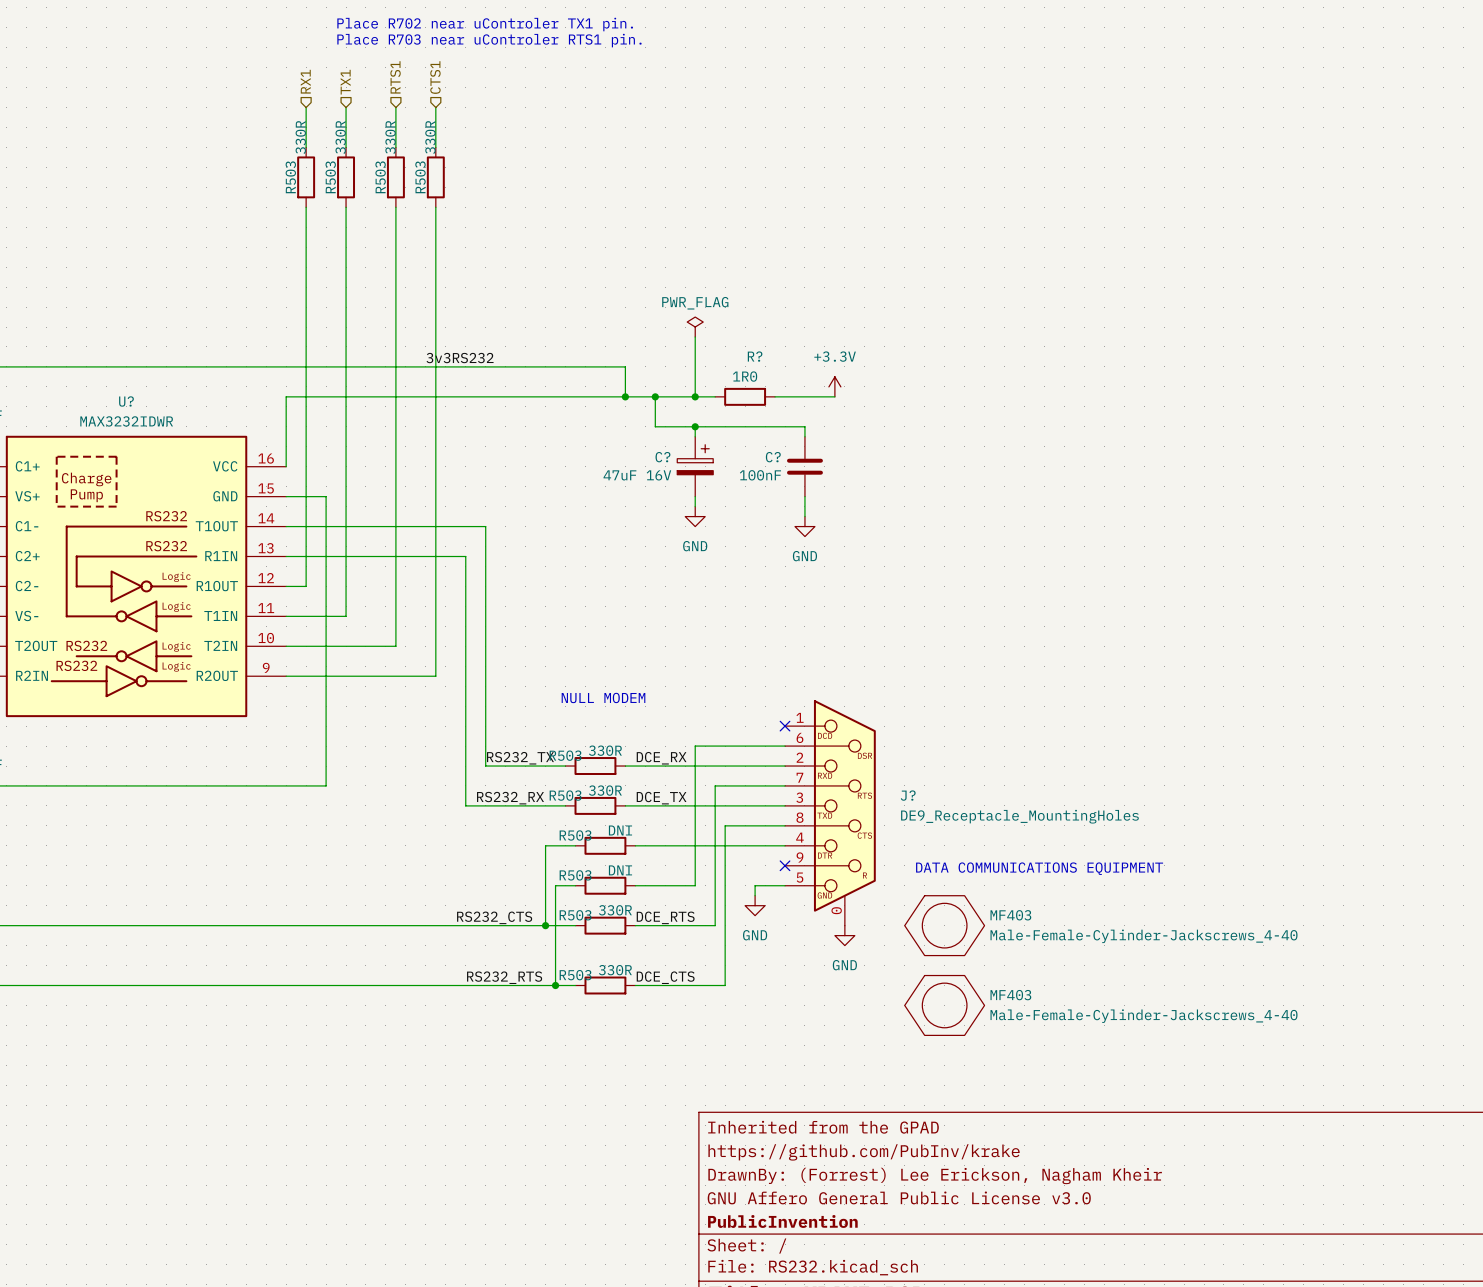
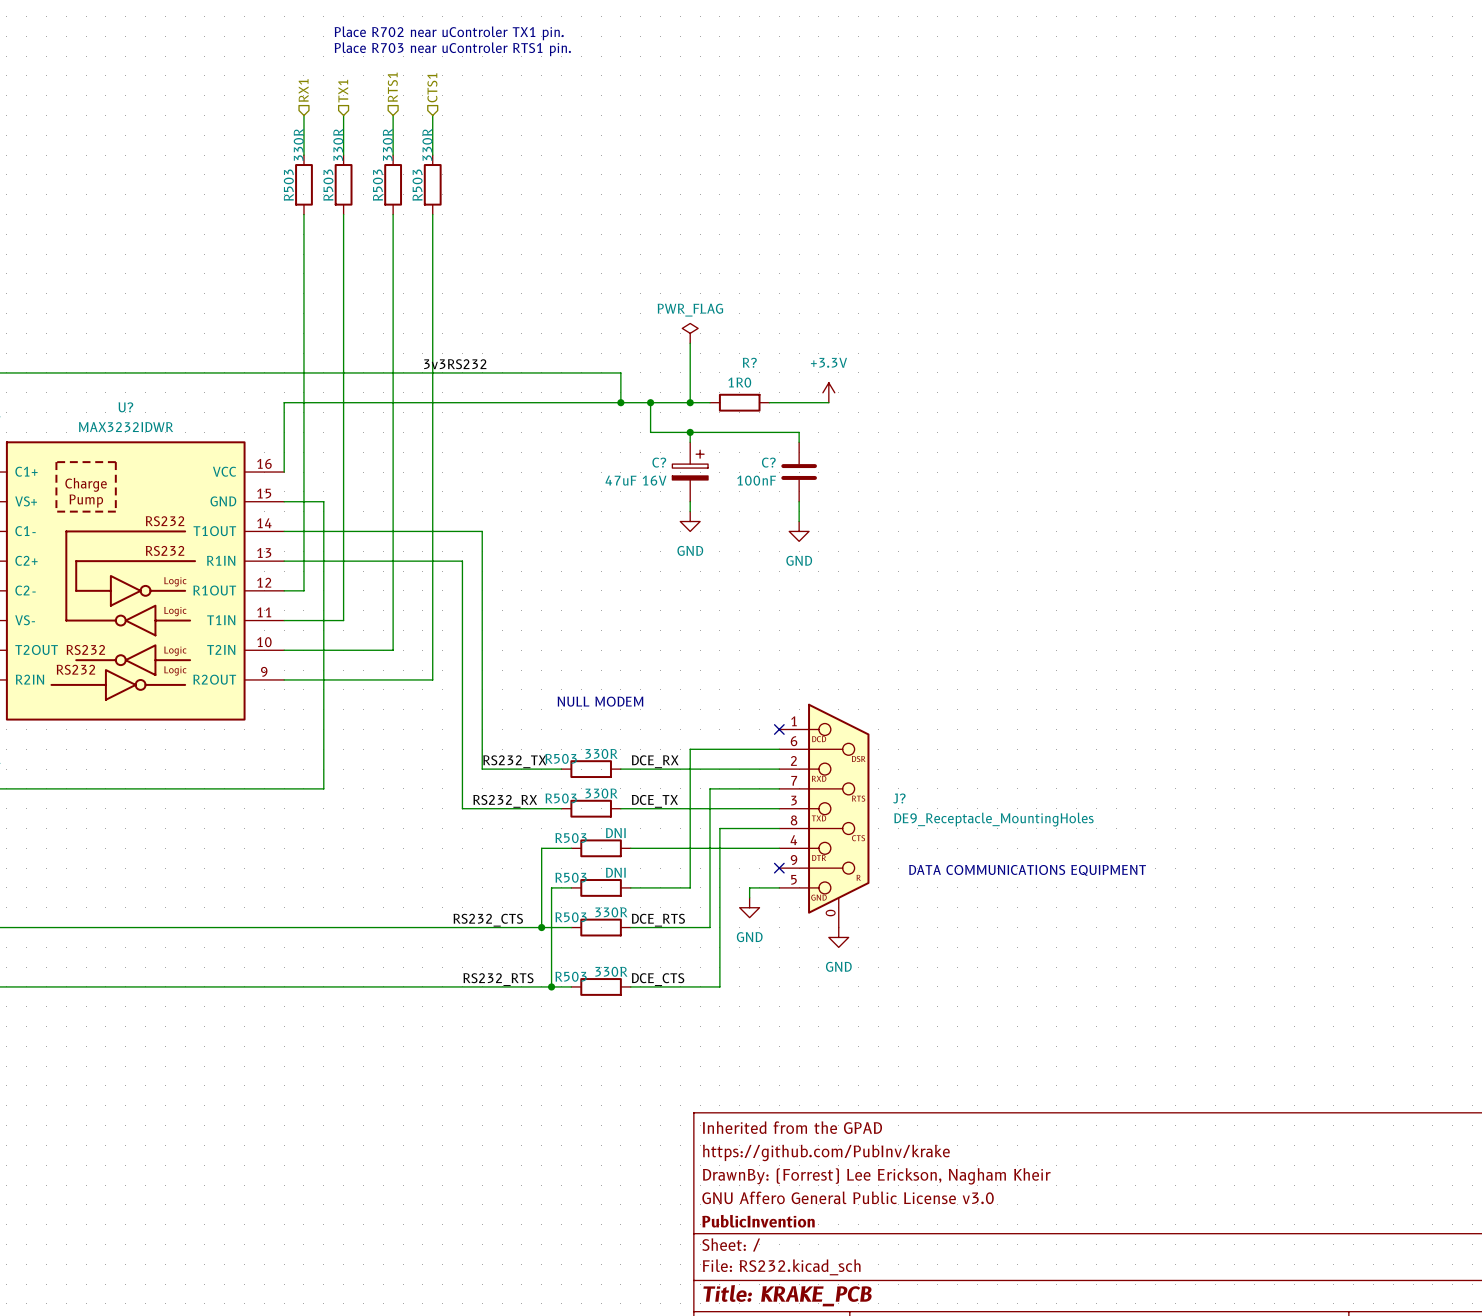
MF403: Male-Female-Cylinder-Jackscrews_4-40 (944, 925) -> none
MF403: Male-Female-Cylinder-Jackscrews_4-40 (944, 1005) -> none

